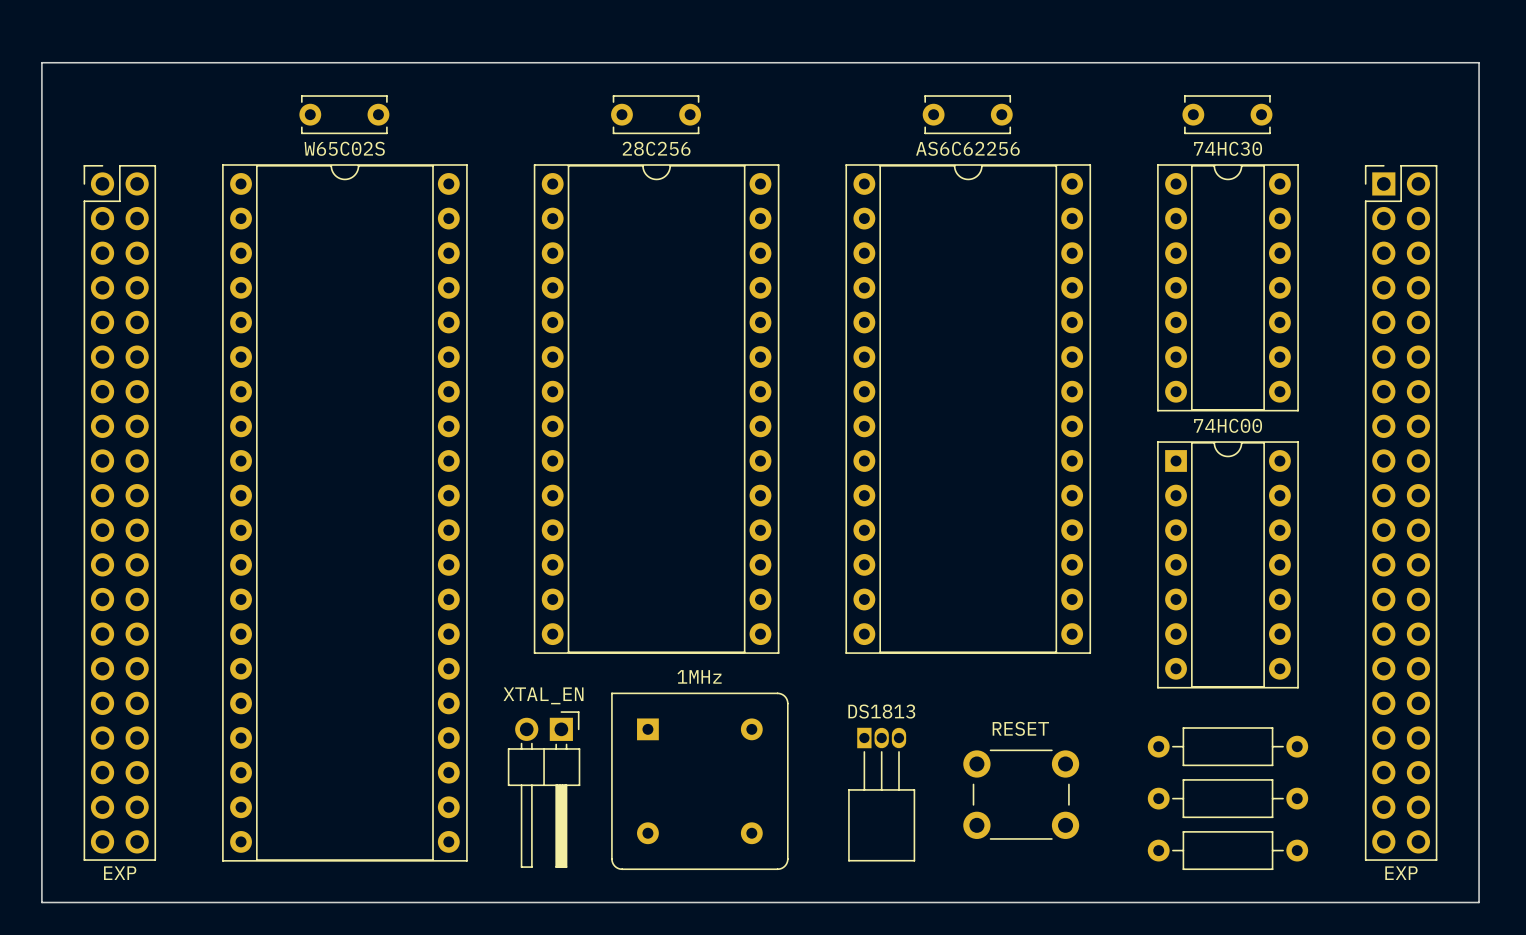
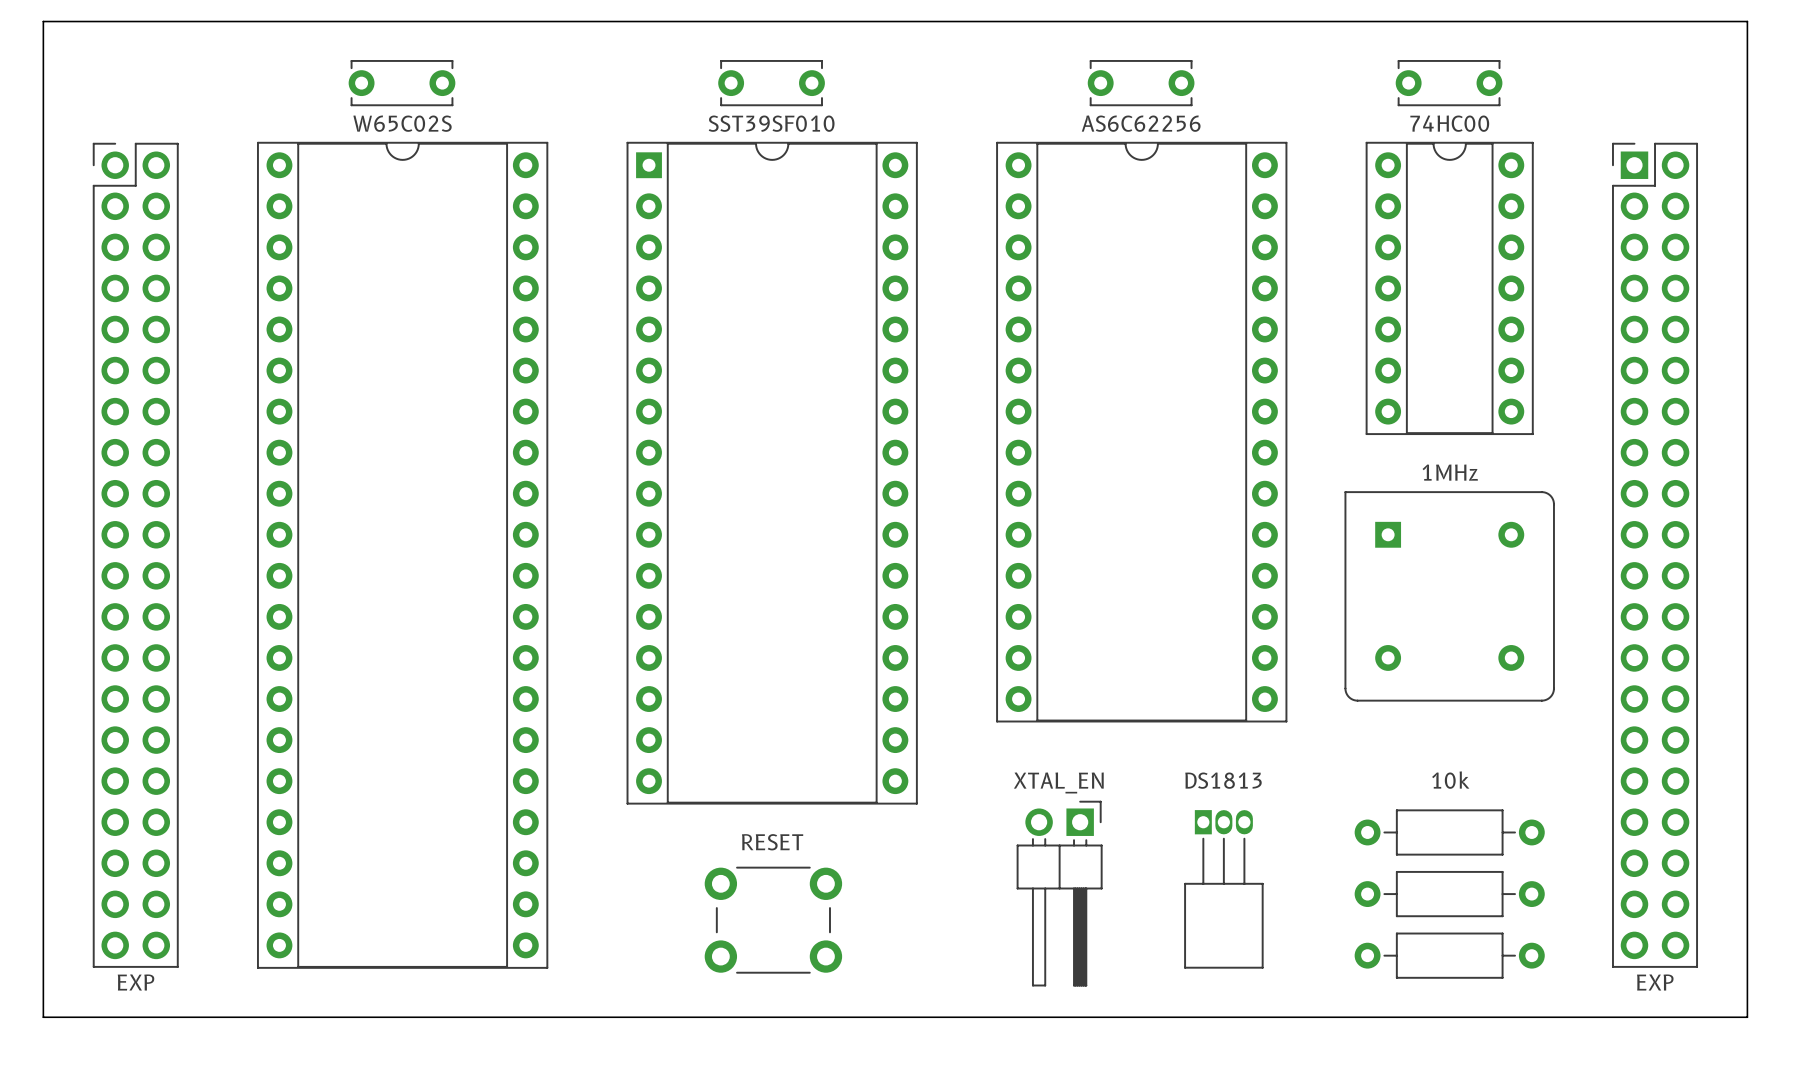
part value: 74HC30 (1228, 148) -> 74HC00 (1449, 123)
part: 28C256 (656, 409) -> none
part: none -> SST39SF010 (772, 473)
part: none -> 1MHz (1449, 596)
part: 74HC00 (1227, 564) -> none
part value: none -> 10k (1450, 780)
part value position: DS1813 (881, 711) -> DS1813 (1223, 780)
part: 1MHz (699, 781) -> none
part: XTAL_EN (544, 789) -> none
part position: (881, 794) -> (1223, 889)
part: RESET (1021, 794) -> none
part: none -> XTAL_EN (1059, 893)
part: none -> RESET (773, 920)

